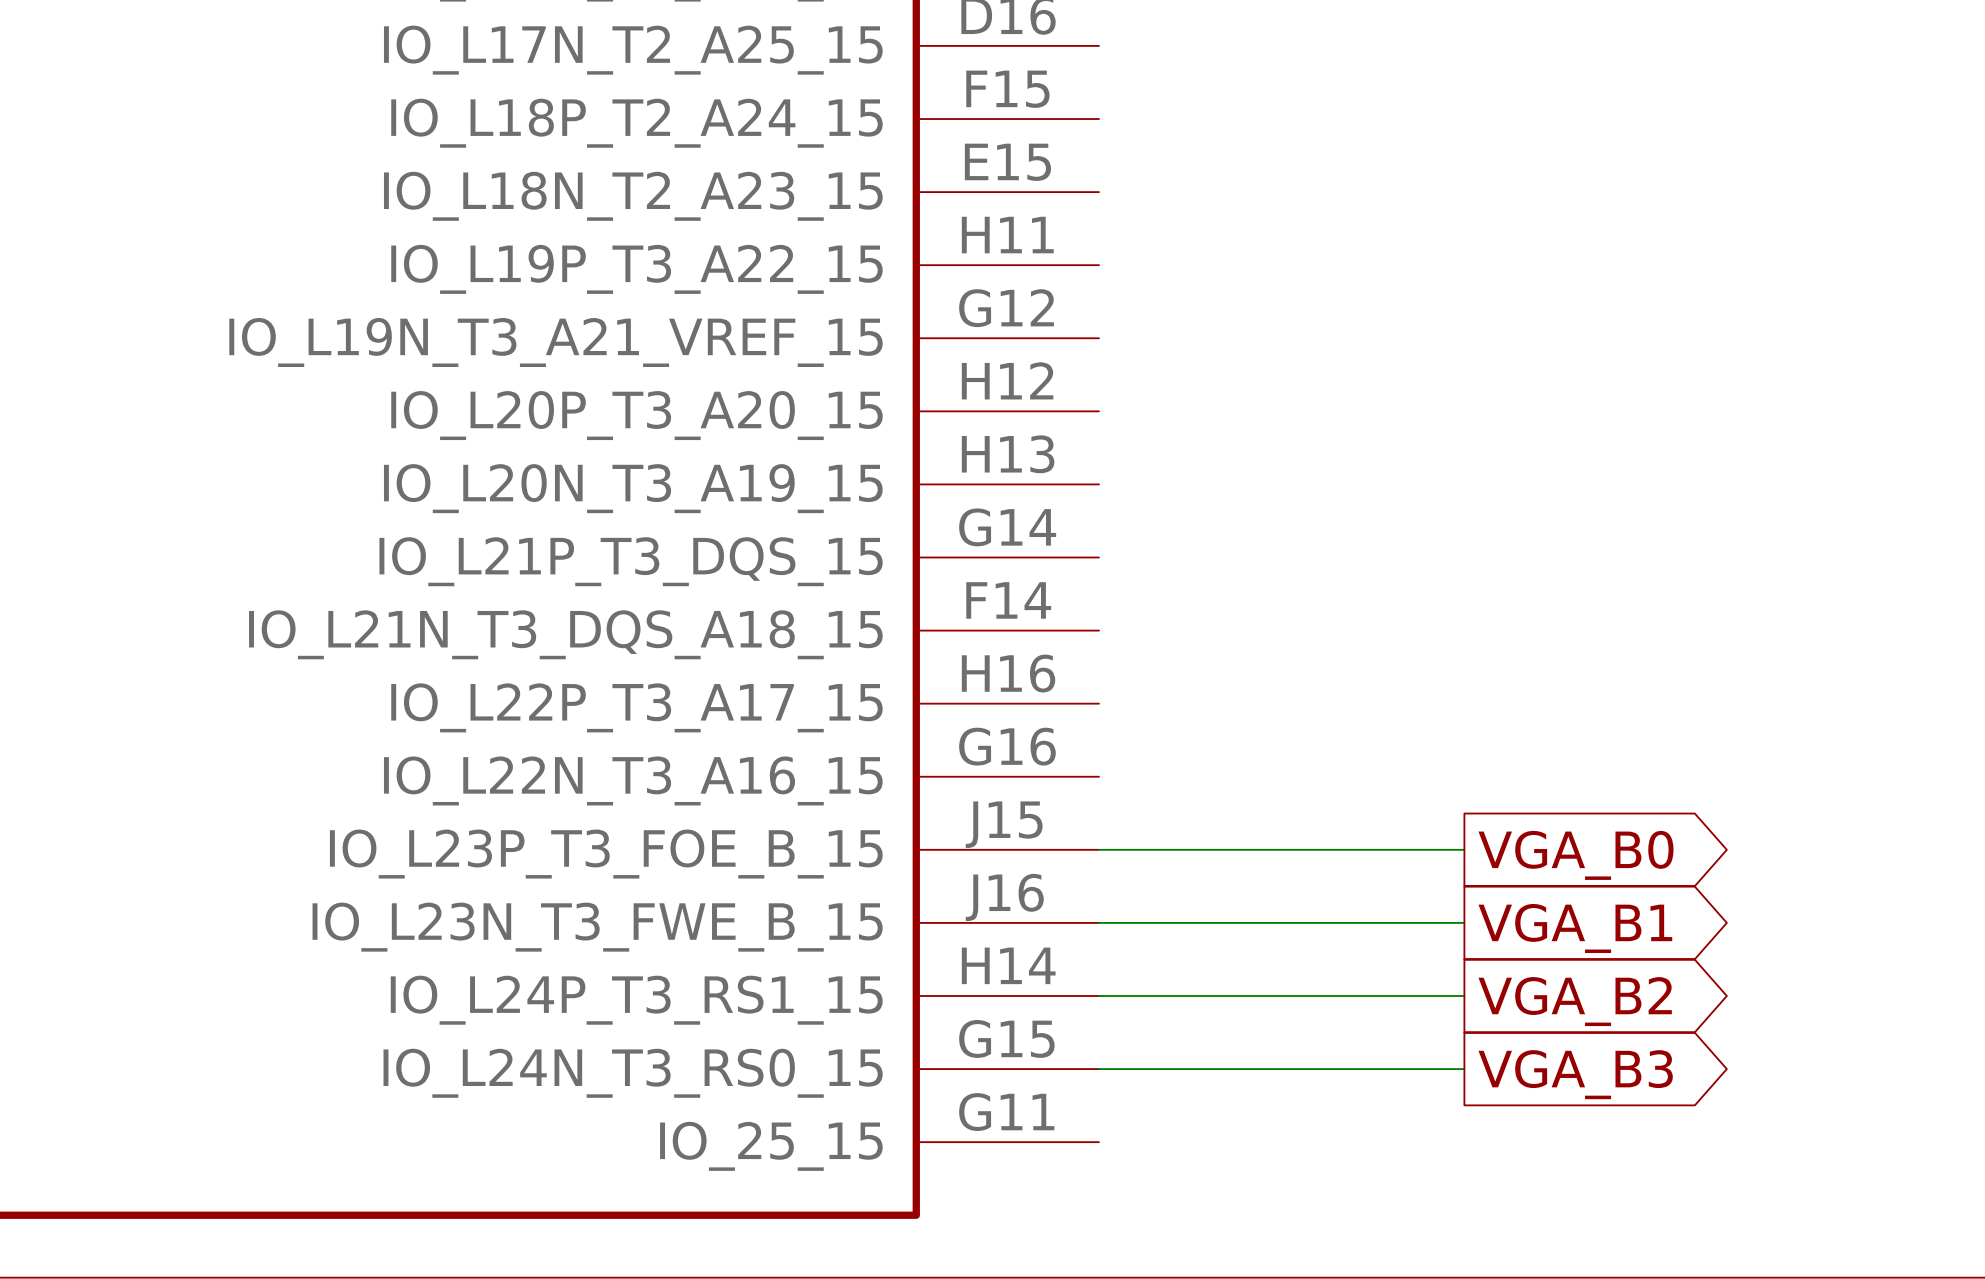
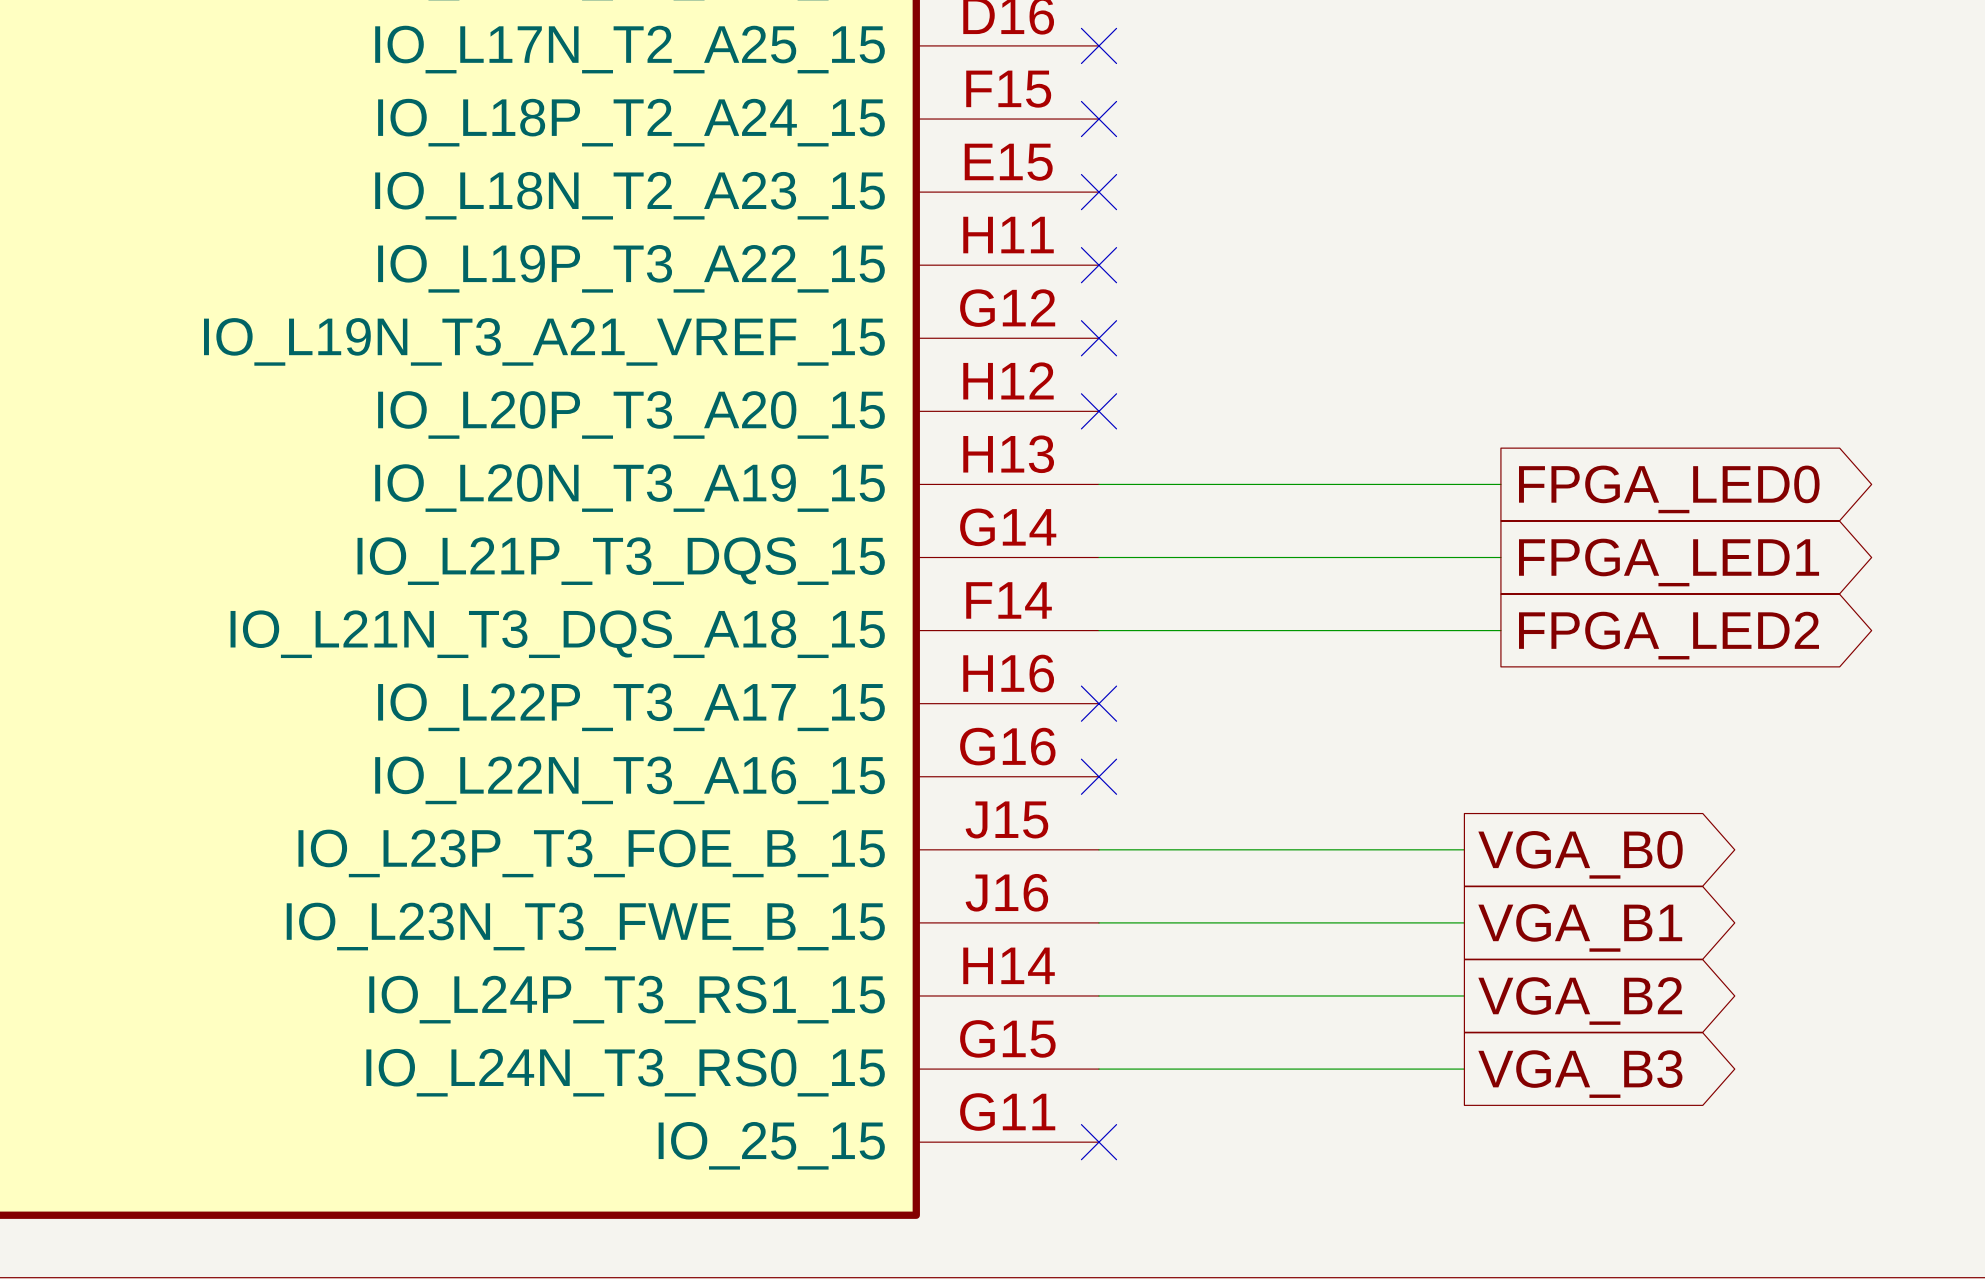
no-connect mark: none -> (1098, 45)
no-connect mark: none -> (1098, 119)
no-connect mark: none -> (1098, 192)
no-connect mark: none -> (1098, 265)
no-connect mark: none -> (1098, 338)
no-connect mark: none -> (1098, 411)
wire: none -> (1098, 484) (1500, 484)
global label: none -> FPGA_LED0 (1669, 489)
wire: none -> (1098, 557) (1500, 557)
global label: none -> FPGA_LED1 (1669, 562)
wire: none -> (1098, 630) (1500, 630)
global label: none -> FPGA_LED2 (1668, 635)
no-connect mark: none -> (1098, 703)
no-connect mark: none -> (1098, 776)
no-connect mark: none -> (1098, 1142)

